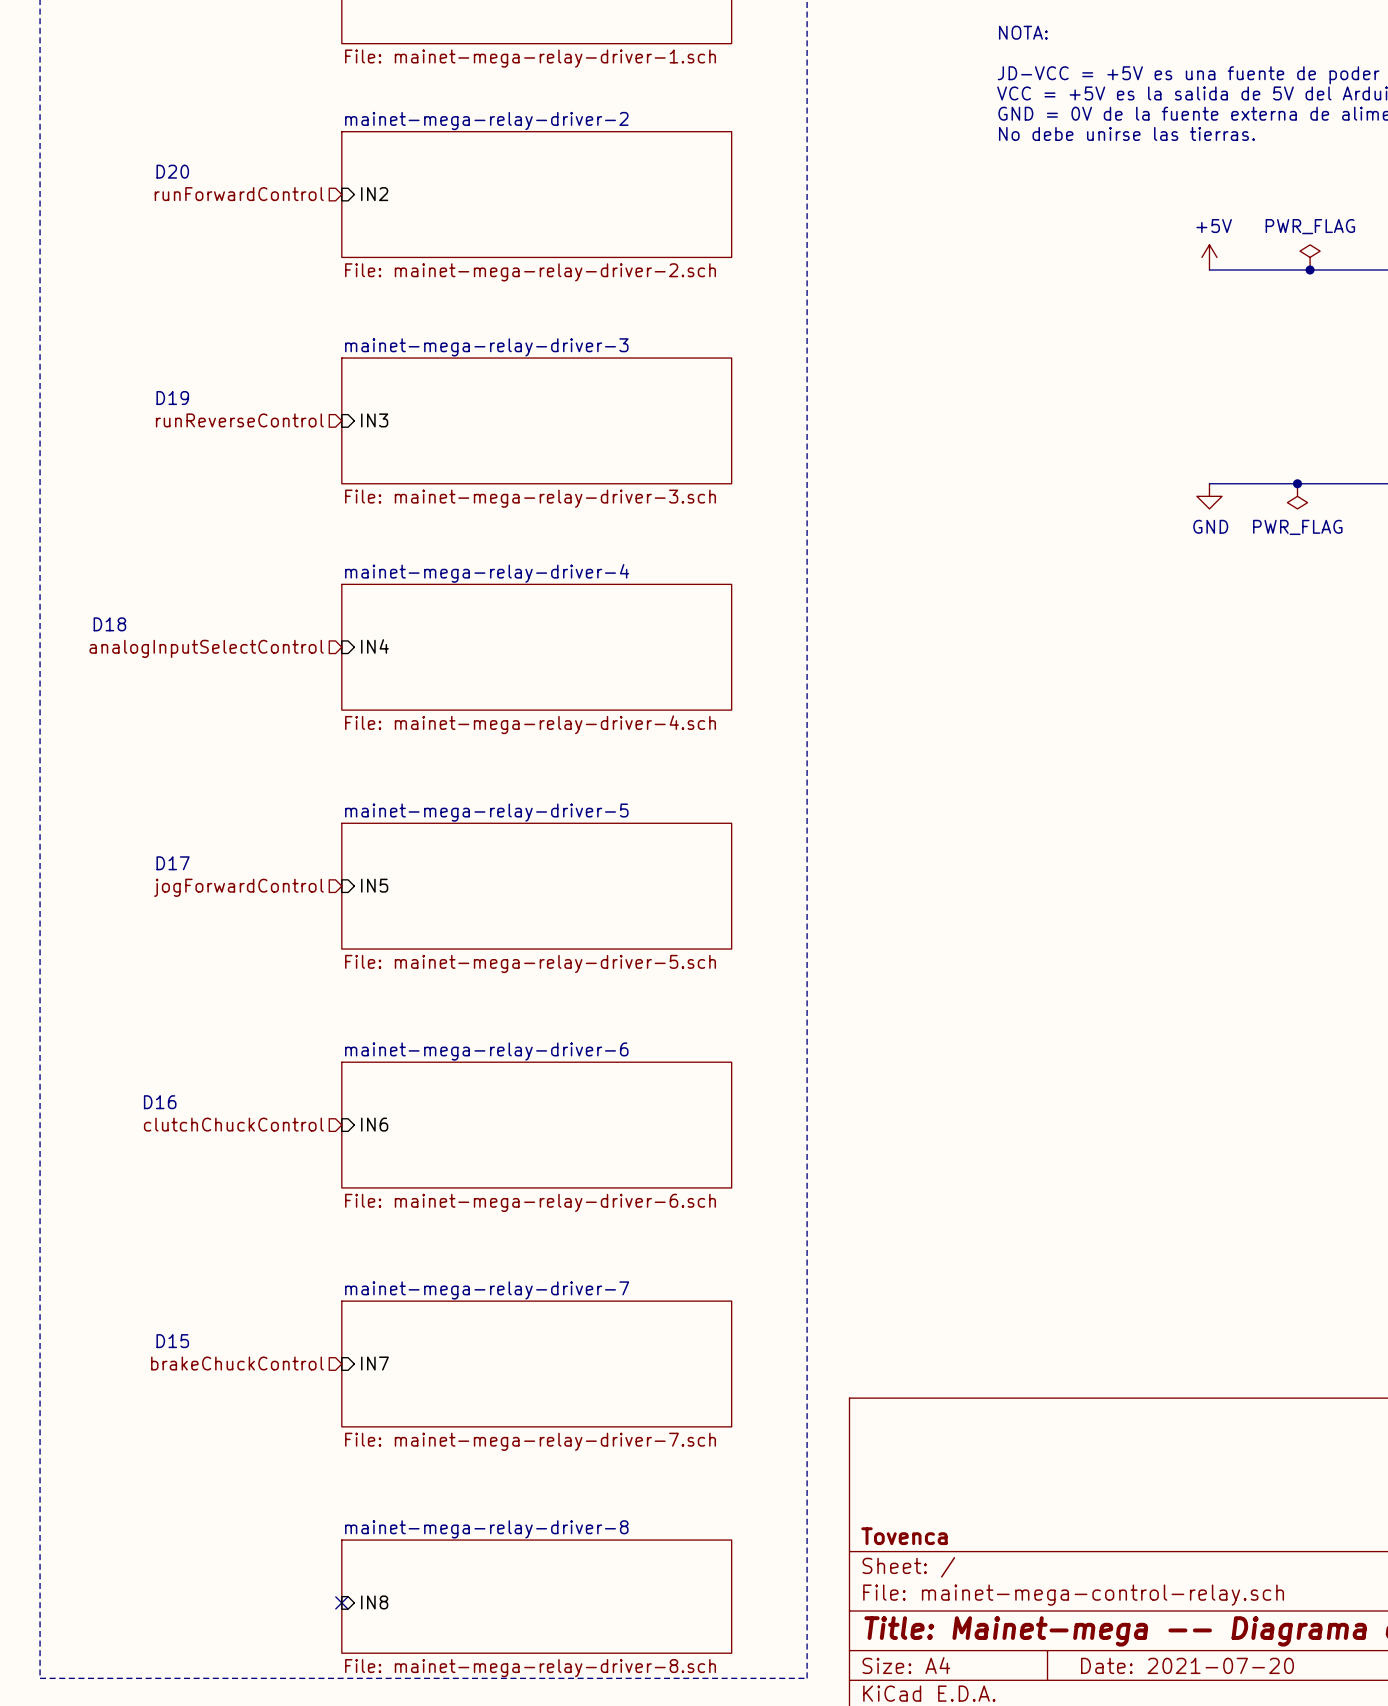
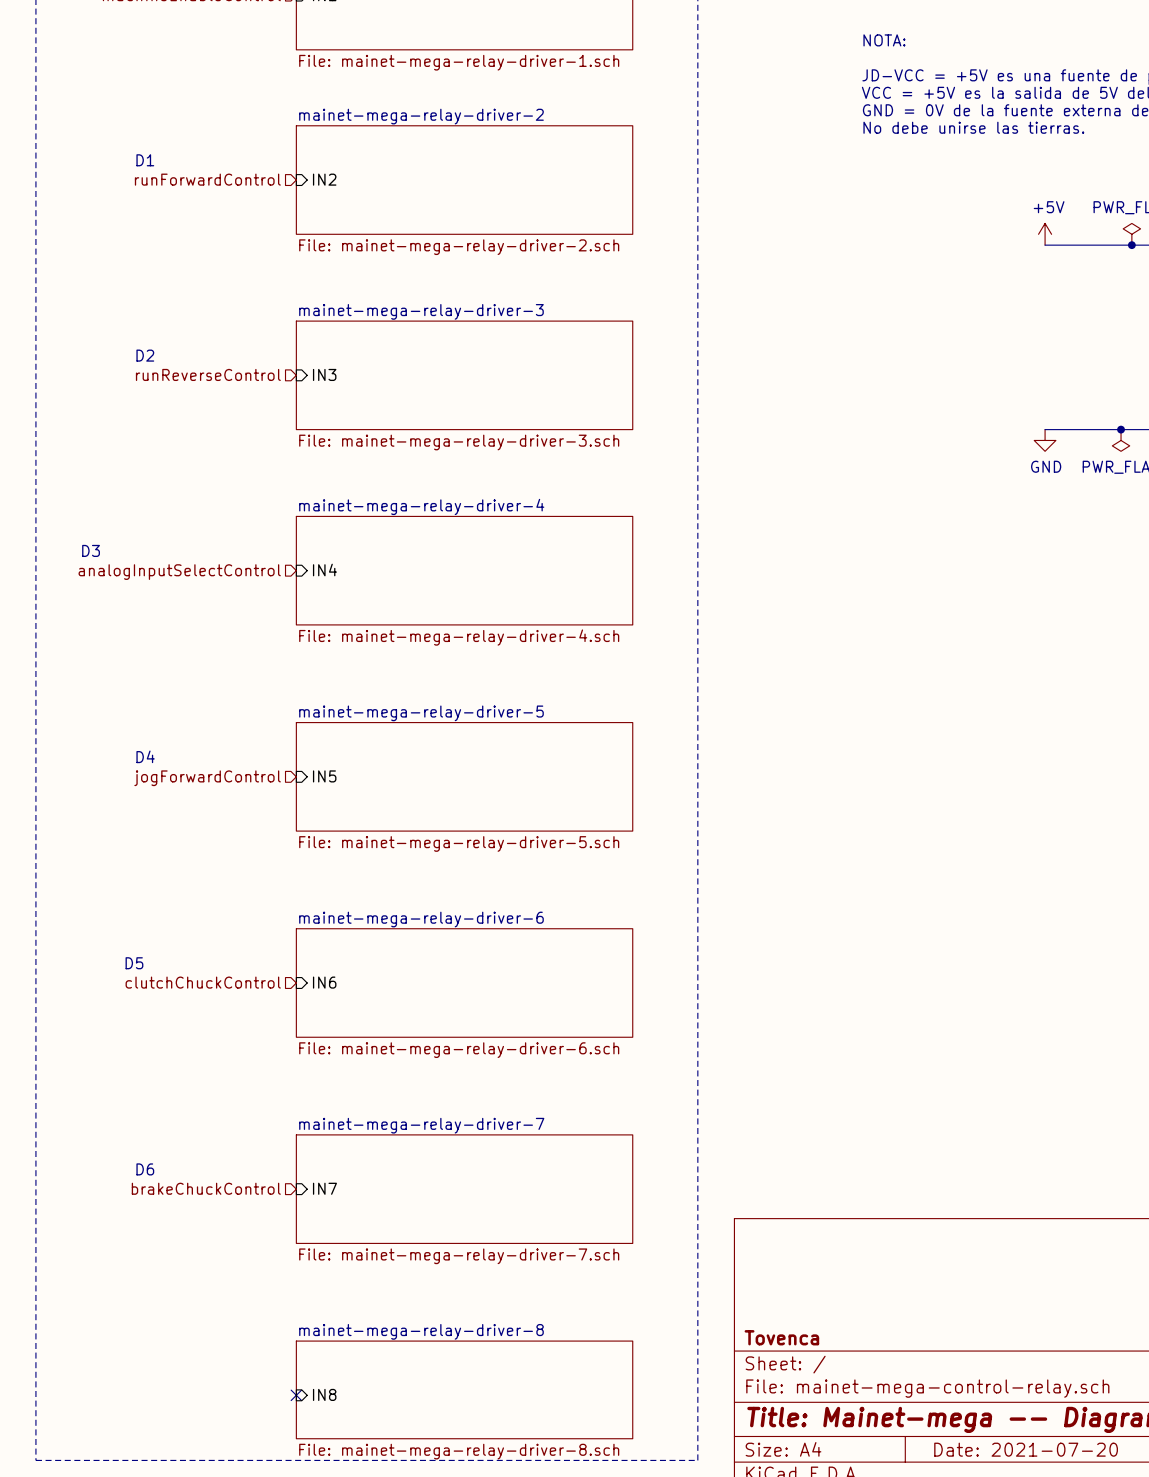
text: D20 (172, 171) -> D1 (145, 160)
text: D19 (172, 398) -> D2 (145, 355)
text: D18 (109, 624) -> D3 (91, 550)
text: D17 (173, 863) -> D4 (145, 756)
text: D16 (160, 1102) -> D5 (134, 963)
text: D15 (172, 1341) -> D6 (145, 1169)

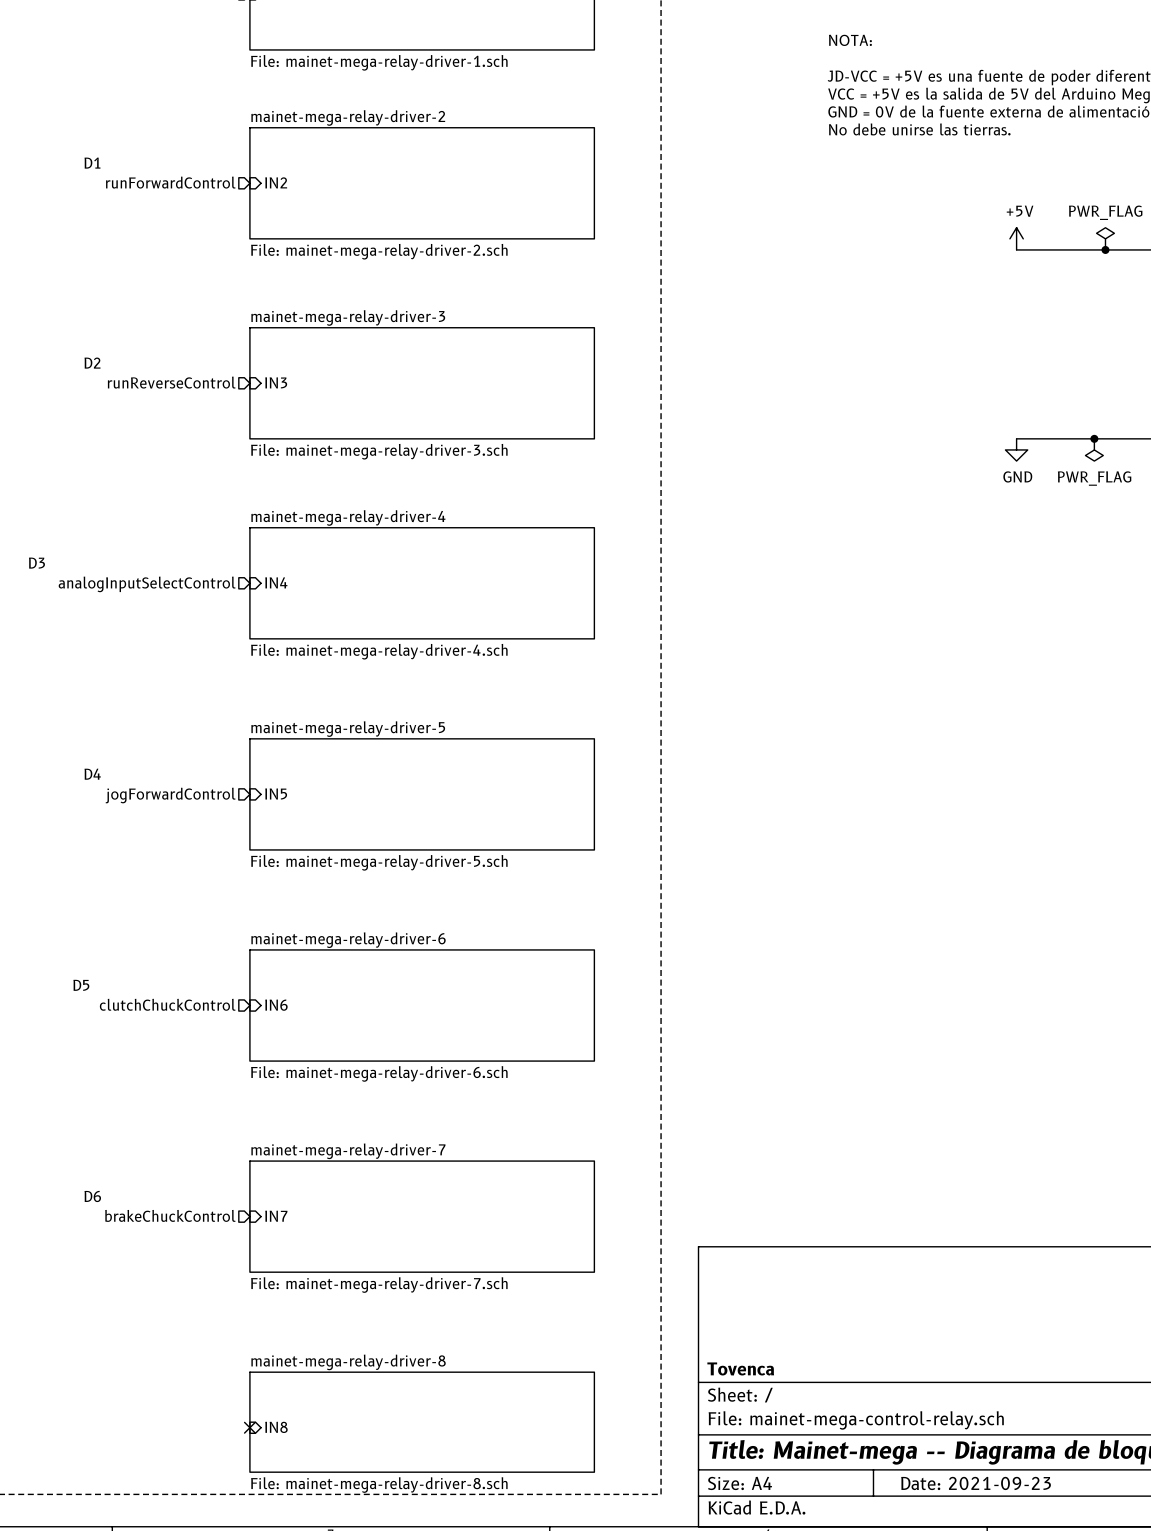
title block: Date: 2021-07-20 (1026, 1449) -> Date: 2021-09-23 (976, 1483)

